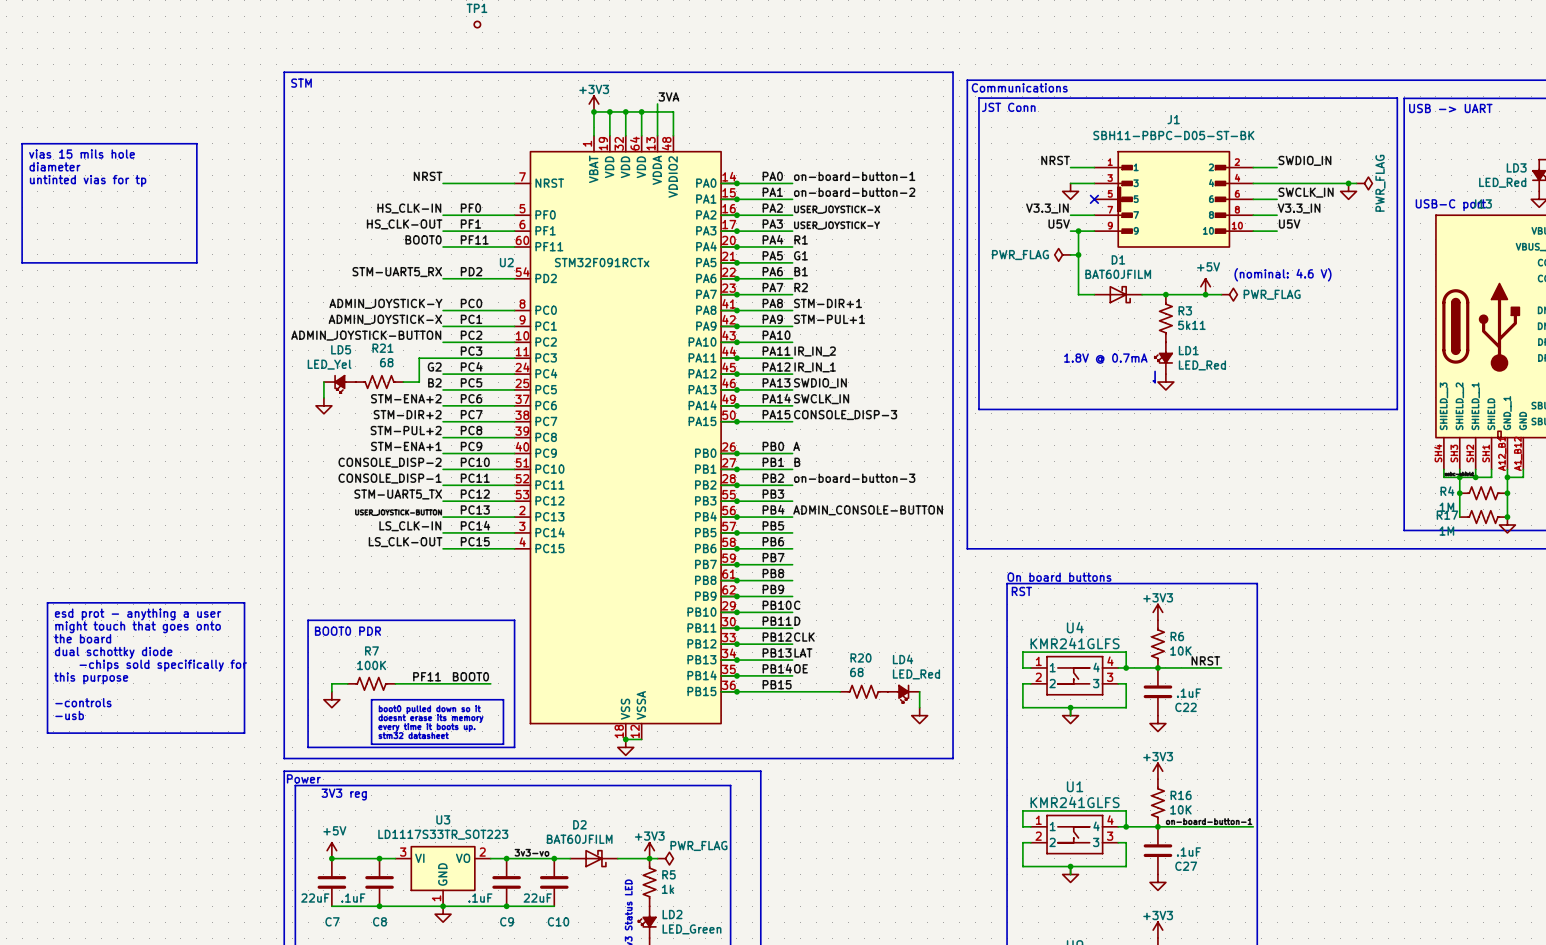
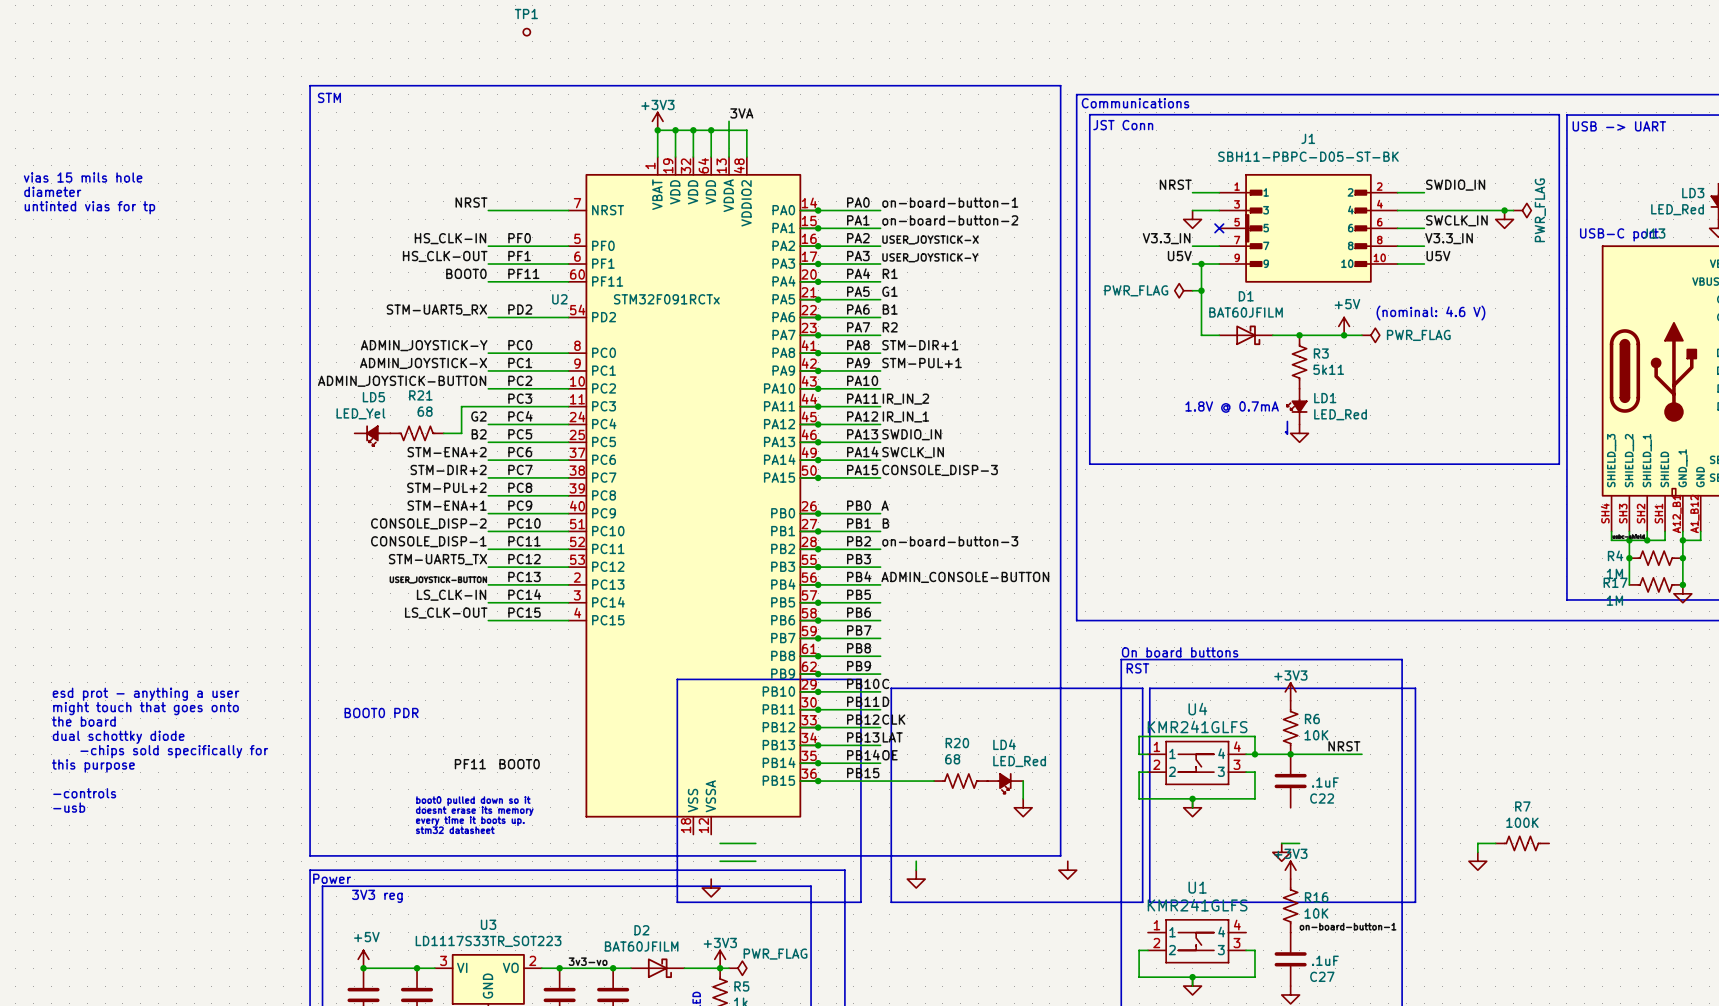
line: (22, 143) (196, 143) (196, 262) (22, 262) (22, 143) -> none
wire: (323, 382) (323, 397) -> none
power symbol: (323, 405) -> none
line: none -> (677, 679) (860, 679) (860, 902) (677, 902) (677, 679)
line: (47, 602) (244, 602) (244, 733) (47, 733) (47, 602) -> none
line: none -> (891, 688) (891, 902) (1142, 902) (1142, 688) (891, 688)
line: none -> (1149, 688) (1415, 688) (1415, 902) (1149, 902) (1149, 688)
line: (308, 620) (514, 620) (514, 747) (308, 747) (308, 620) -> none
wire: (347, 683) (331, 683) (331, 691) -> none
R7 position: (371, 683) -> (1522, 843)
wire: (395, 683) (490, 683) -> none
power symbol: (331, 699) -> none
line: (371, 699) (503, 699) (503, 744) (371, 744) (371, 699) -> none
power symbol position: (1157, 723) -> (1281, 852)
wire: (625, 739) (641, 739) -> none
junction: (625, 739) -> none
power symbol position: (625, 747) -> (711, 888)
wire: none -> (720, 843) (755, 843)
wire: none -> (1281, 843) (1299, 843)
wire: none -> (1495, 843) (1477, 843) (1477, 852)
wire: none -> (720, 861) (755, 861)
wire: none -> (916, 861) (916, 870)
power symbol: none -> (1477, 861)
power symbol: none -> (1067, 870)
power symbol: none -> (916, 879)
wire: (1030, 826) (1022, 826) (1022, 810) (1126, 810) (1126, 826) -> none
wire: (1118, 826) (1253, 826) -> none
junction: (1126, 826) -> none
junction: (1157, 826) -> none

